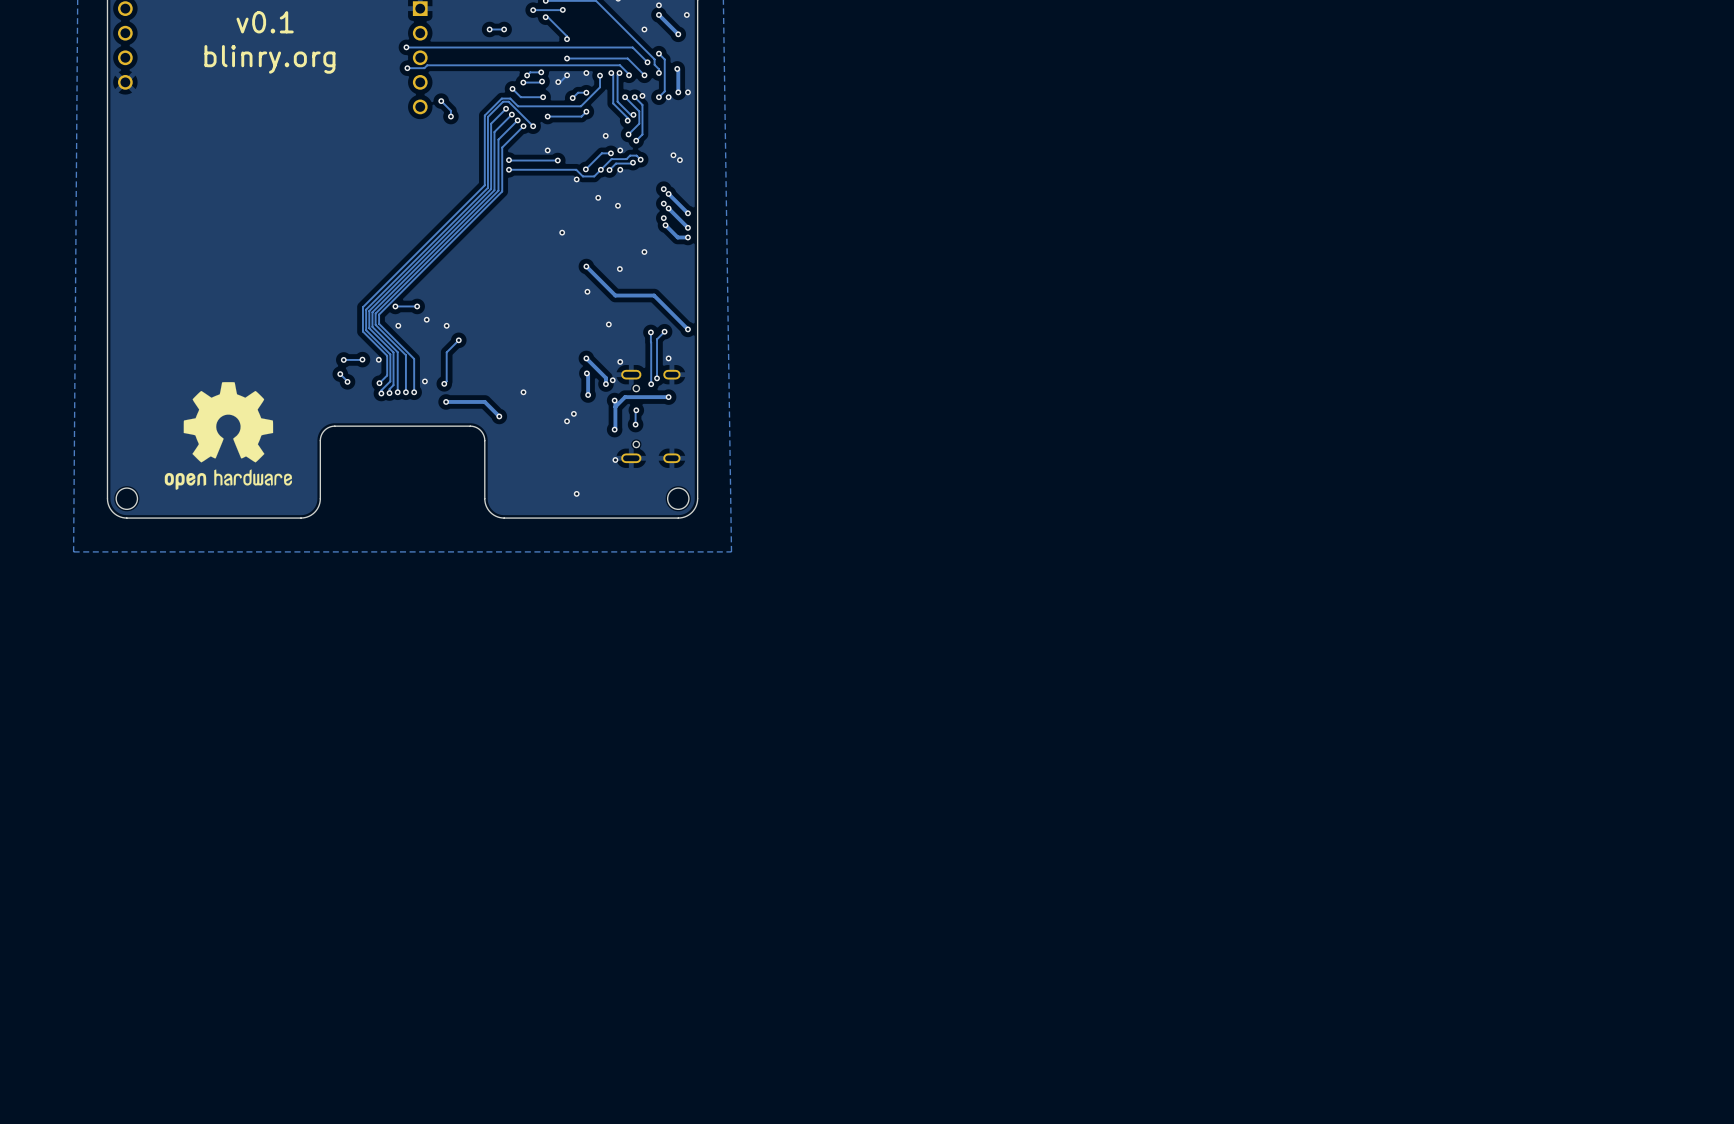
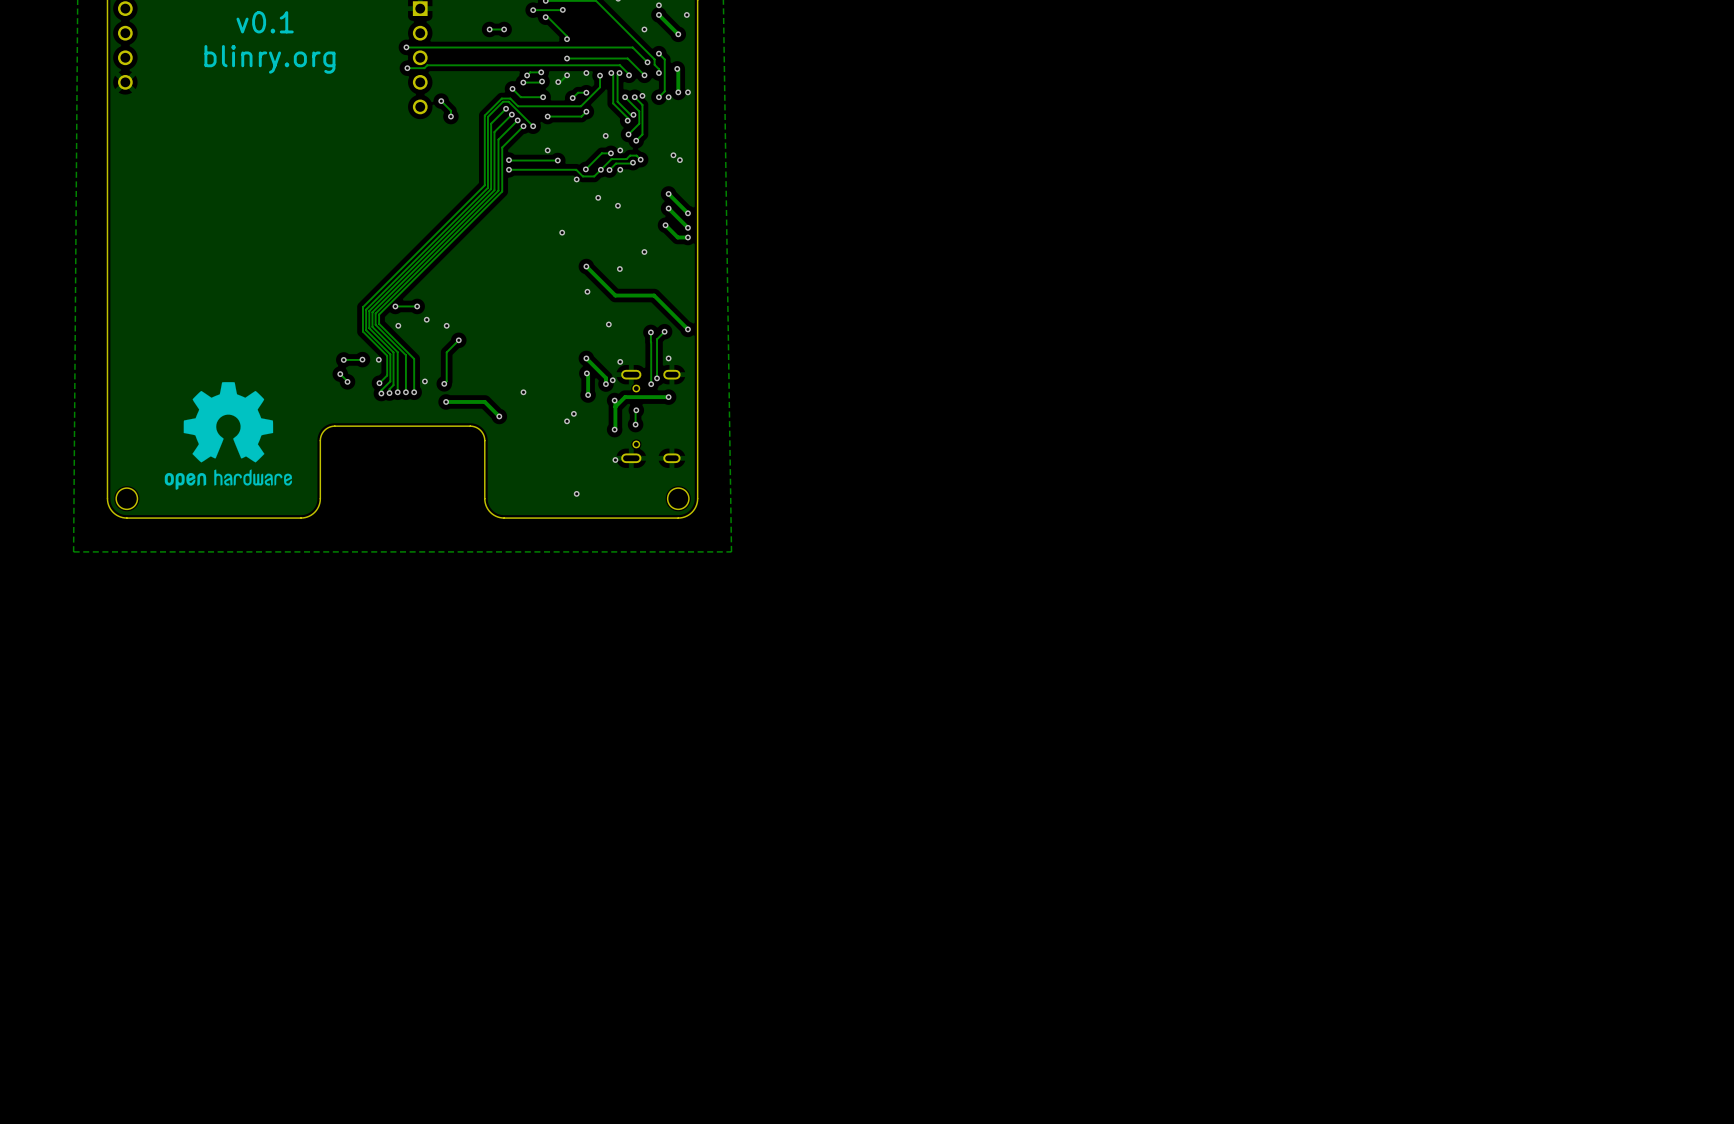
via: (663, 189) -> none
via: (663, 203) -> none
via: (663, 218) -> none

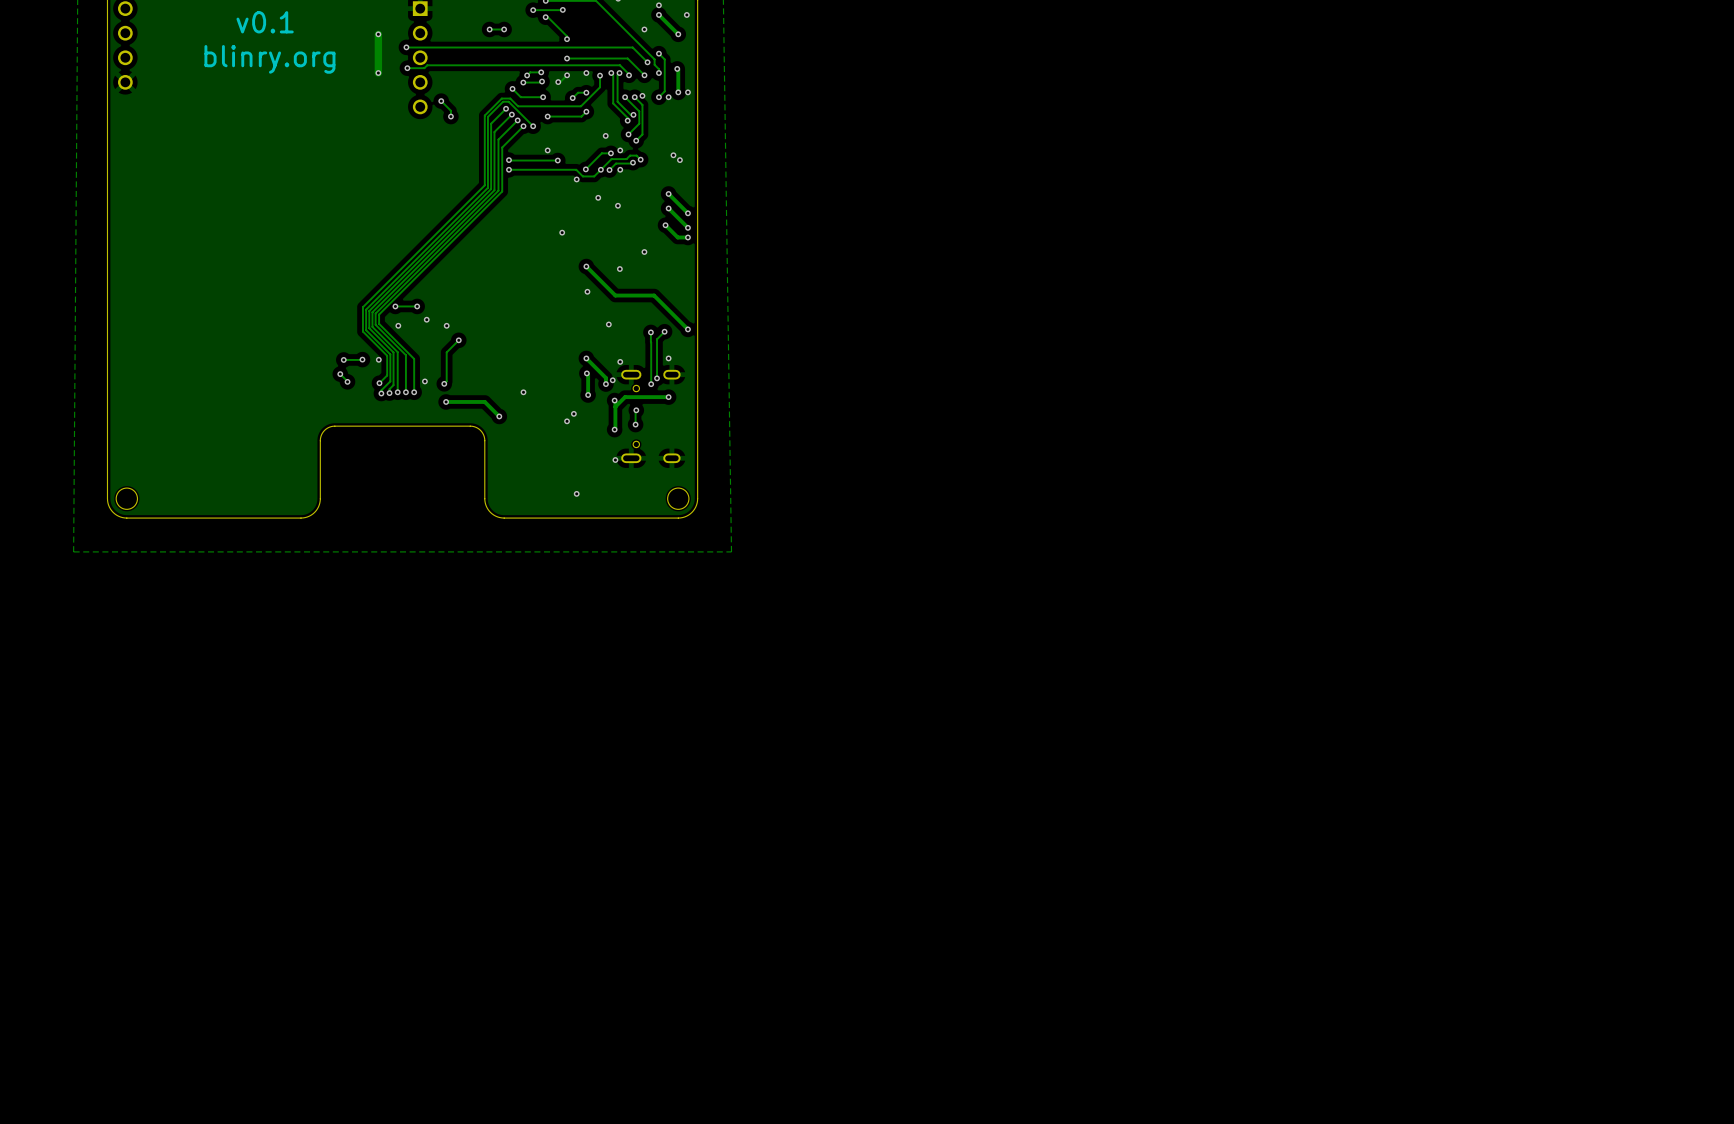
track: none -> (378, 34) (378, 73)
via: none -> (378, 34)
via: none -> (378, 73)
drawing: [164, 382, 293, 490] -> none

